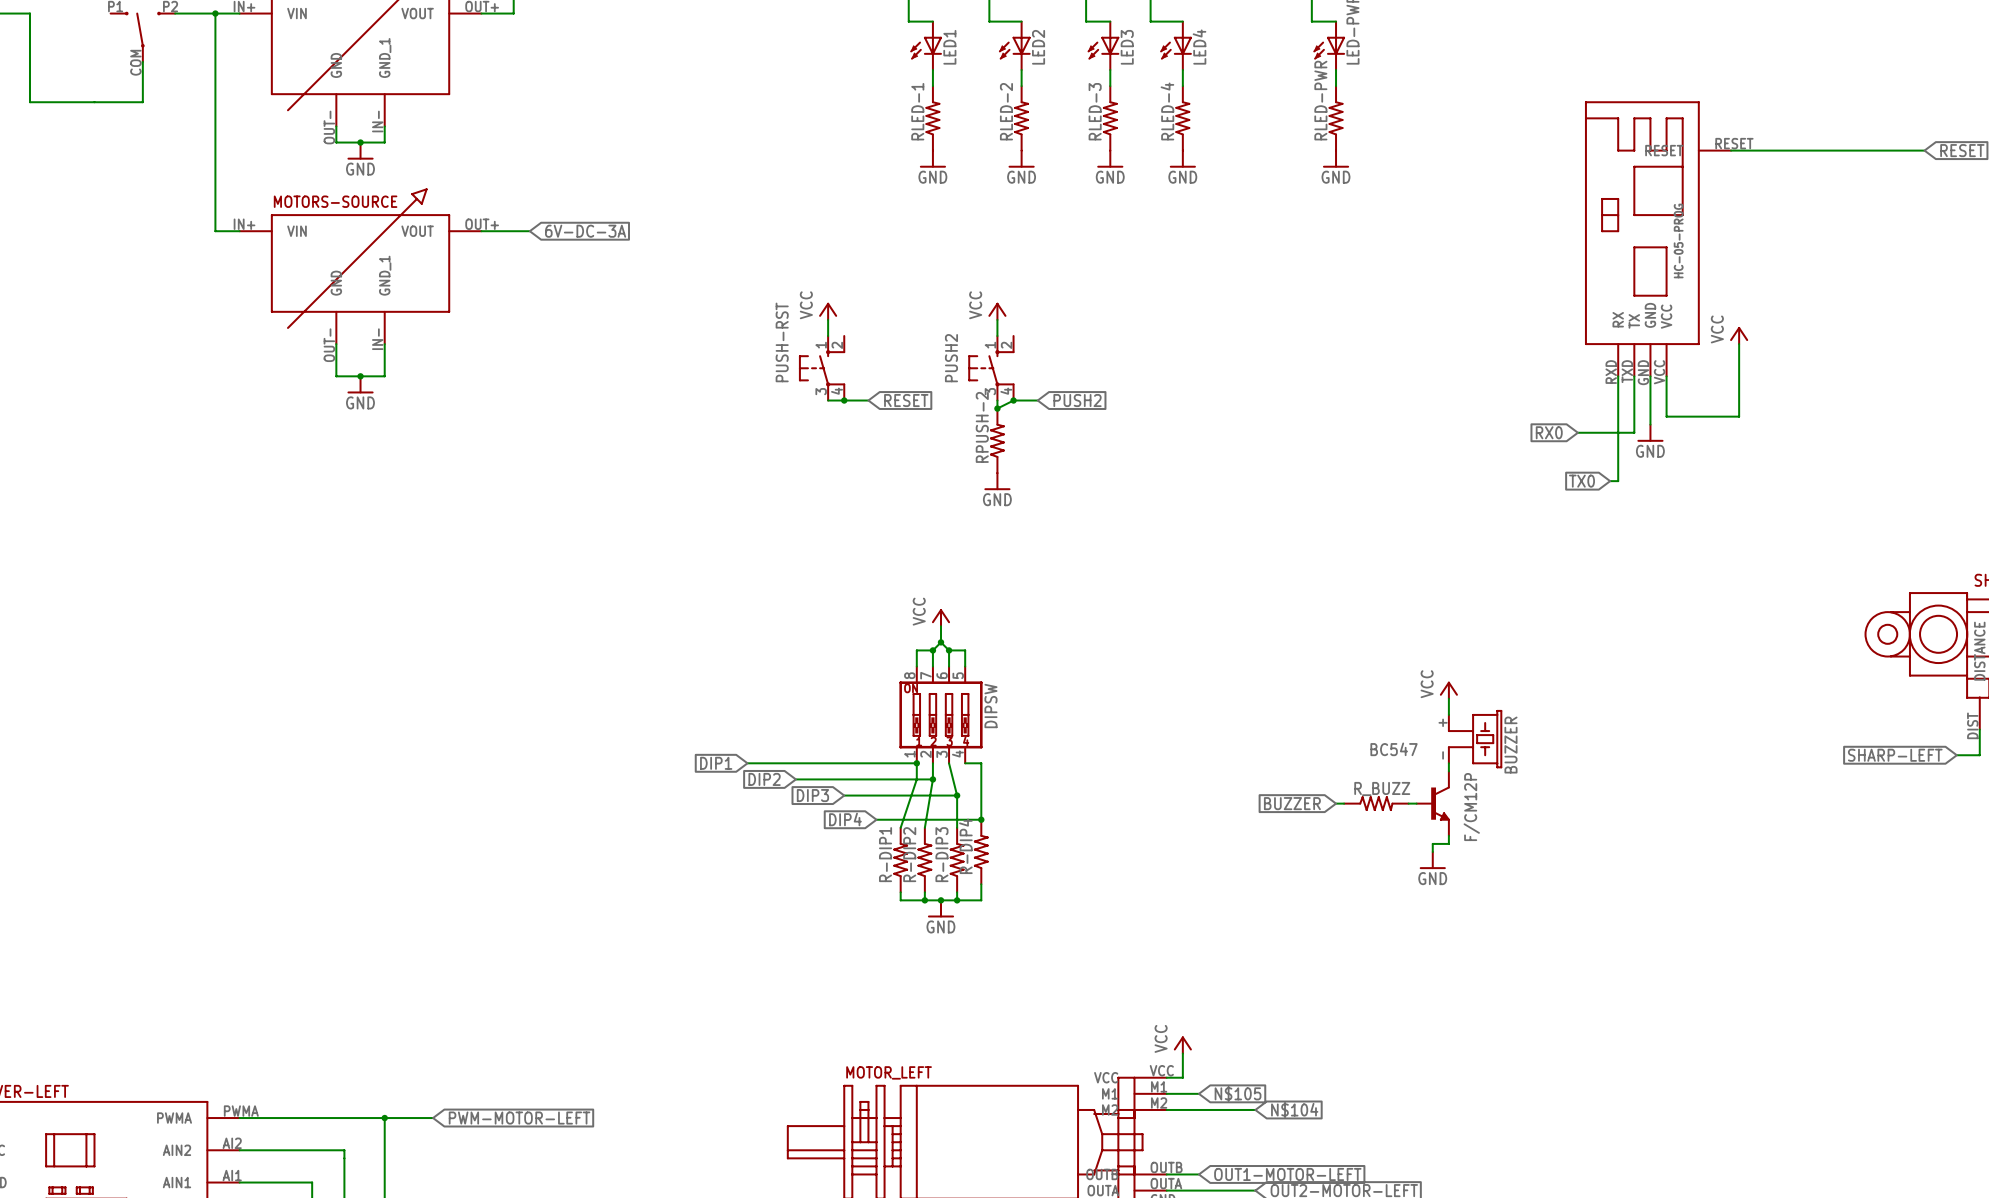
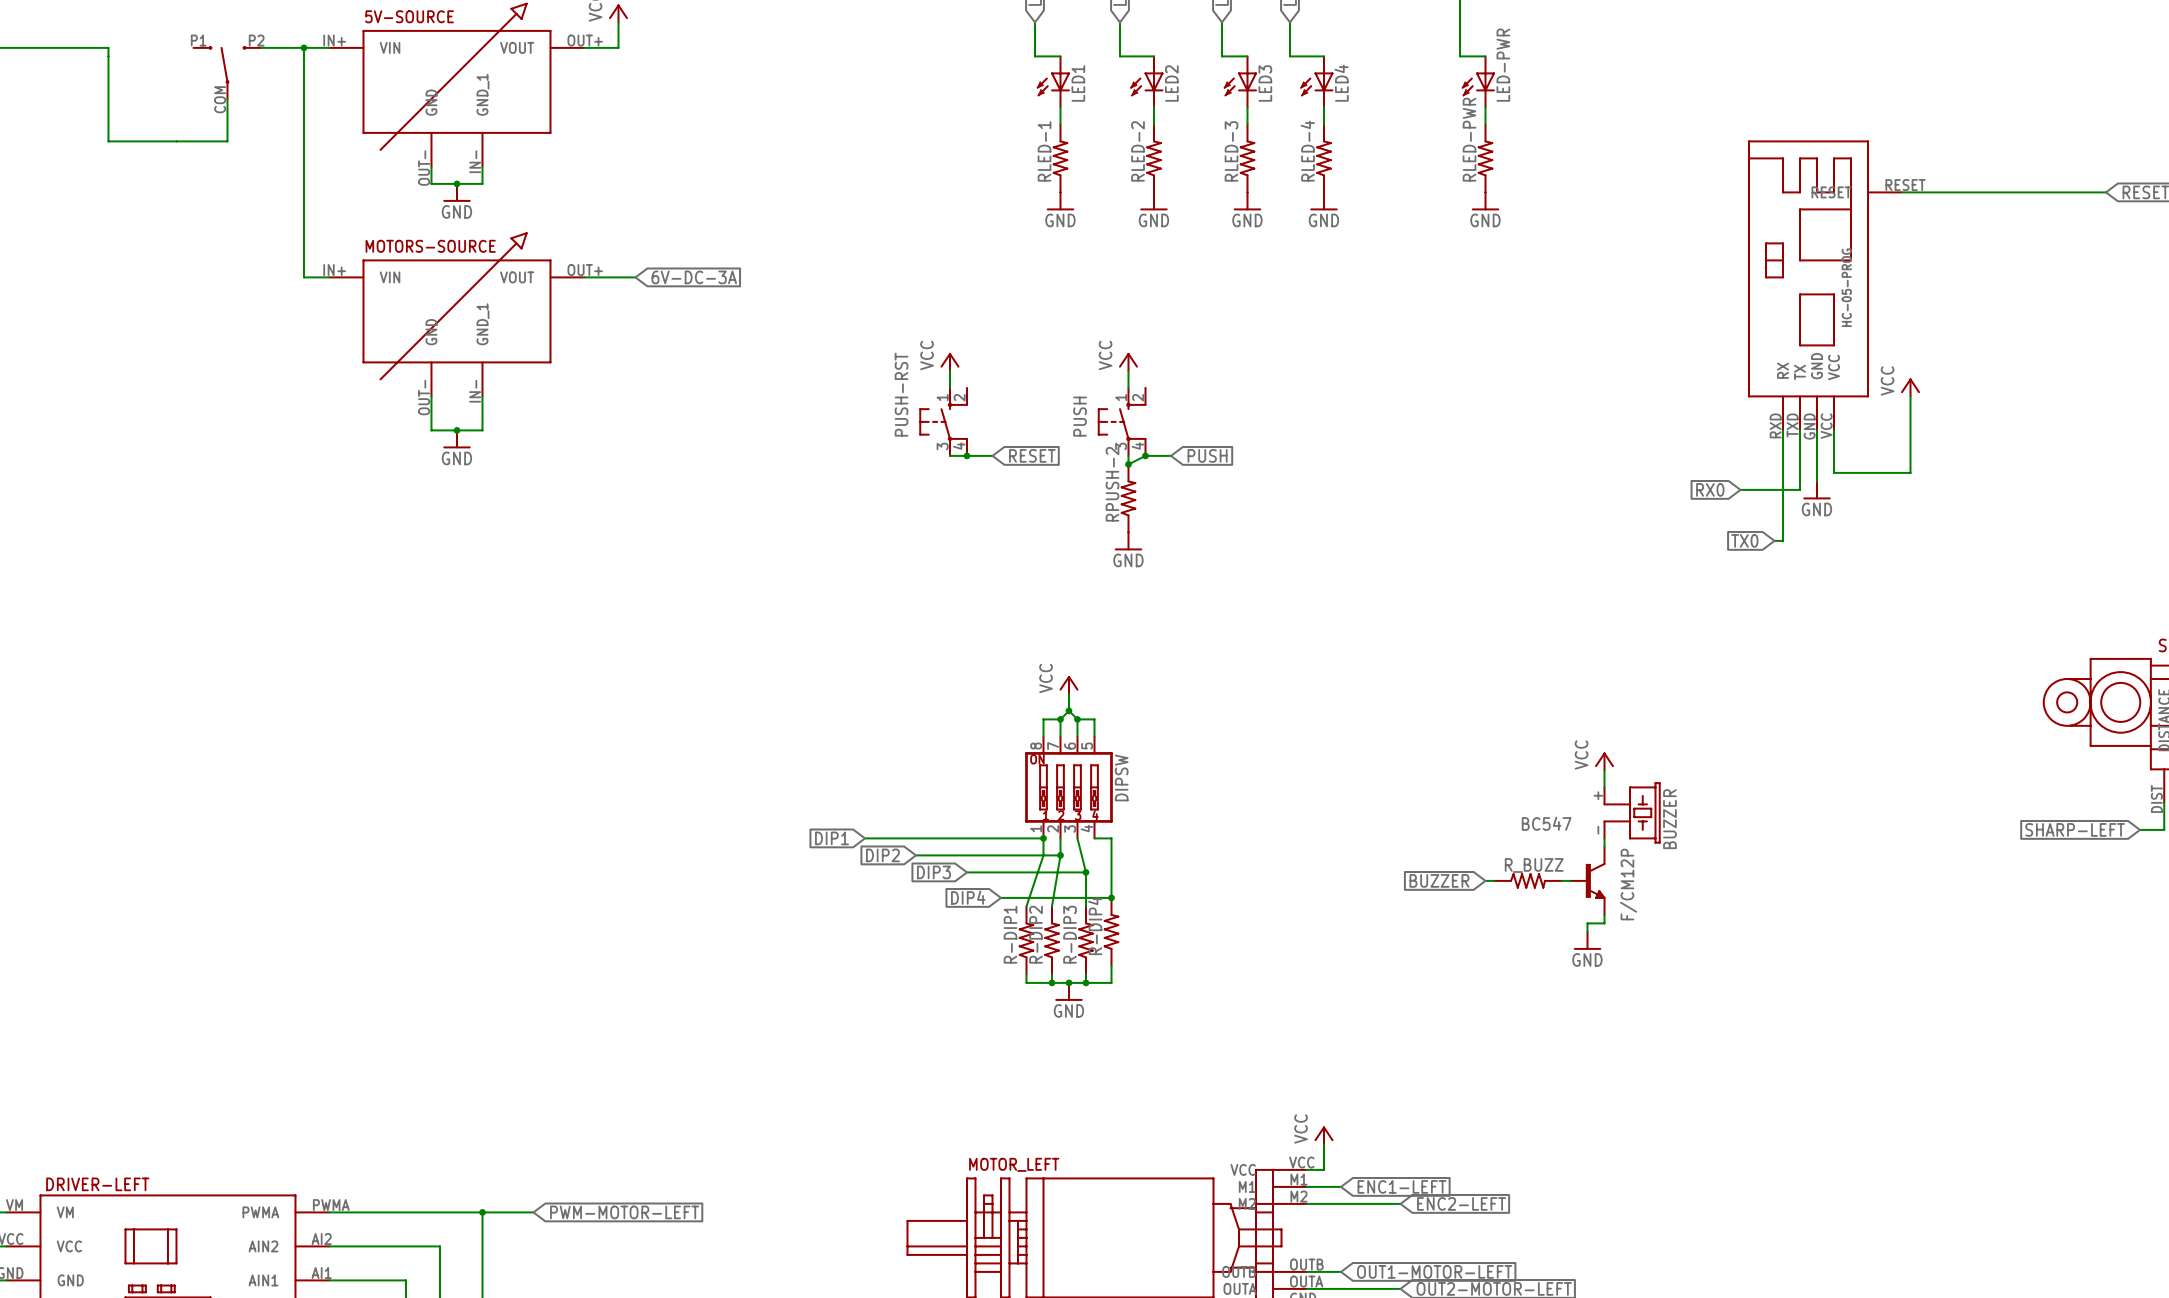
PUSH2 name: PUSH2 (951, 358) -> PUSH (1080, 416)
global label: PUSH2 (1077, 400) -> PUSH (1207, 455)
global label: N$105 (1238, 1093) -> ENC1-LEFT (1402, 1186)
global label: N$104 (1294, 1109) -> ENC2-LEFT (1461, 1203)

